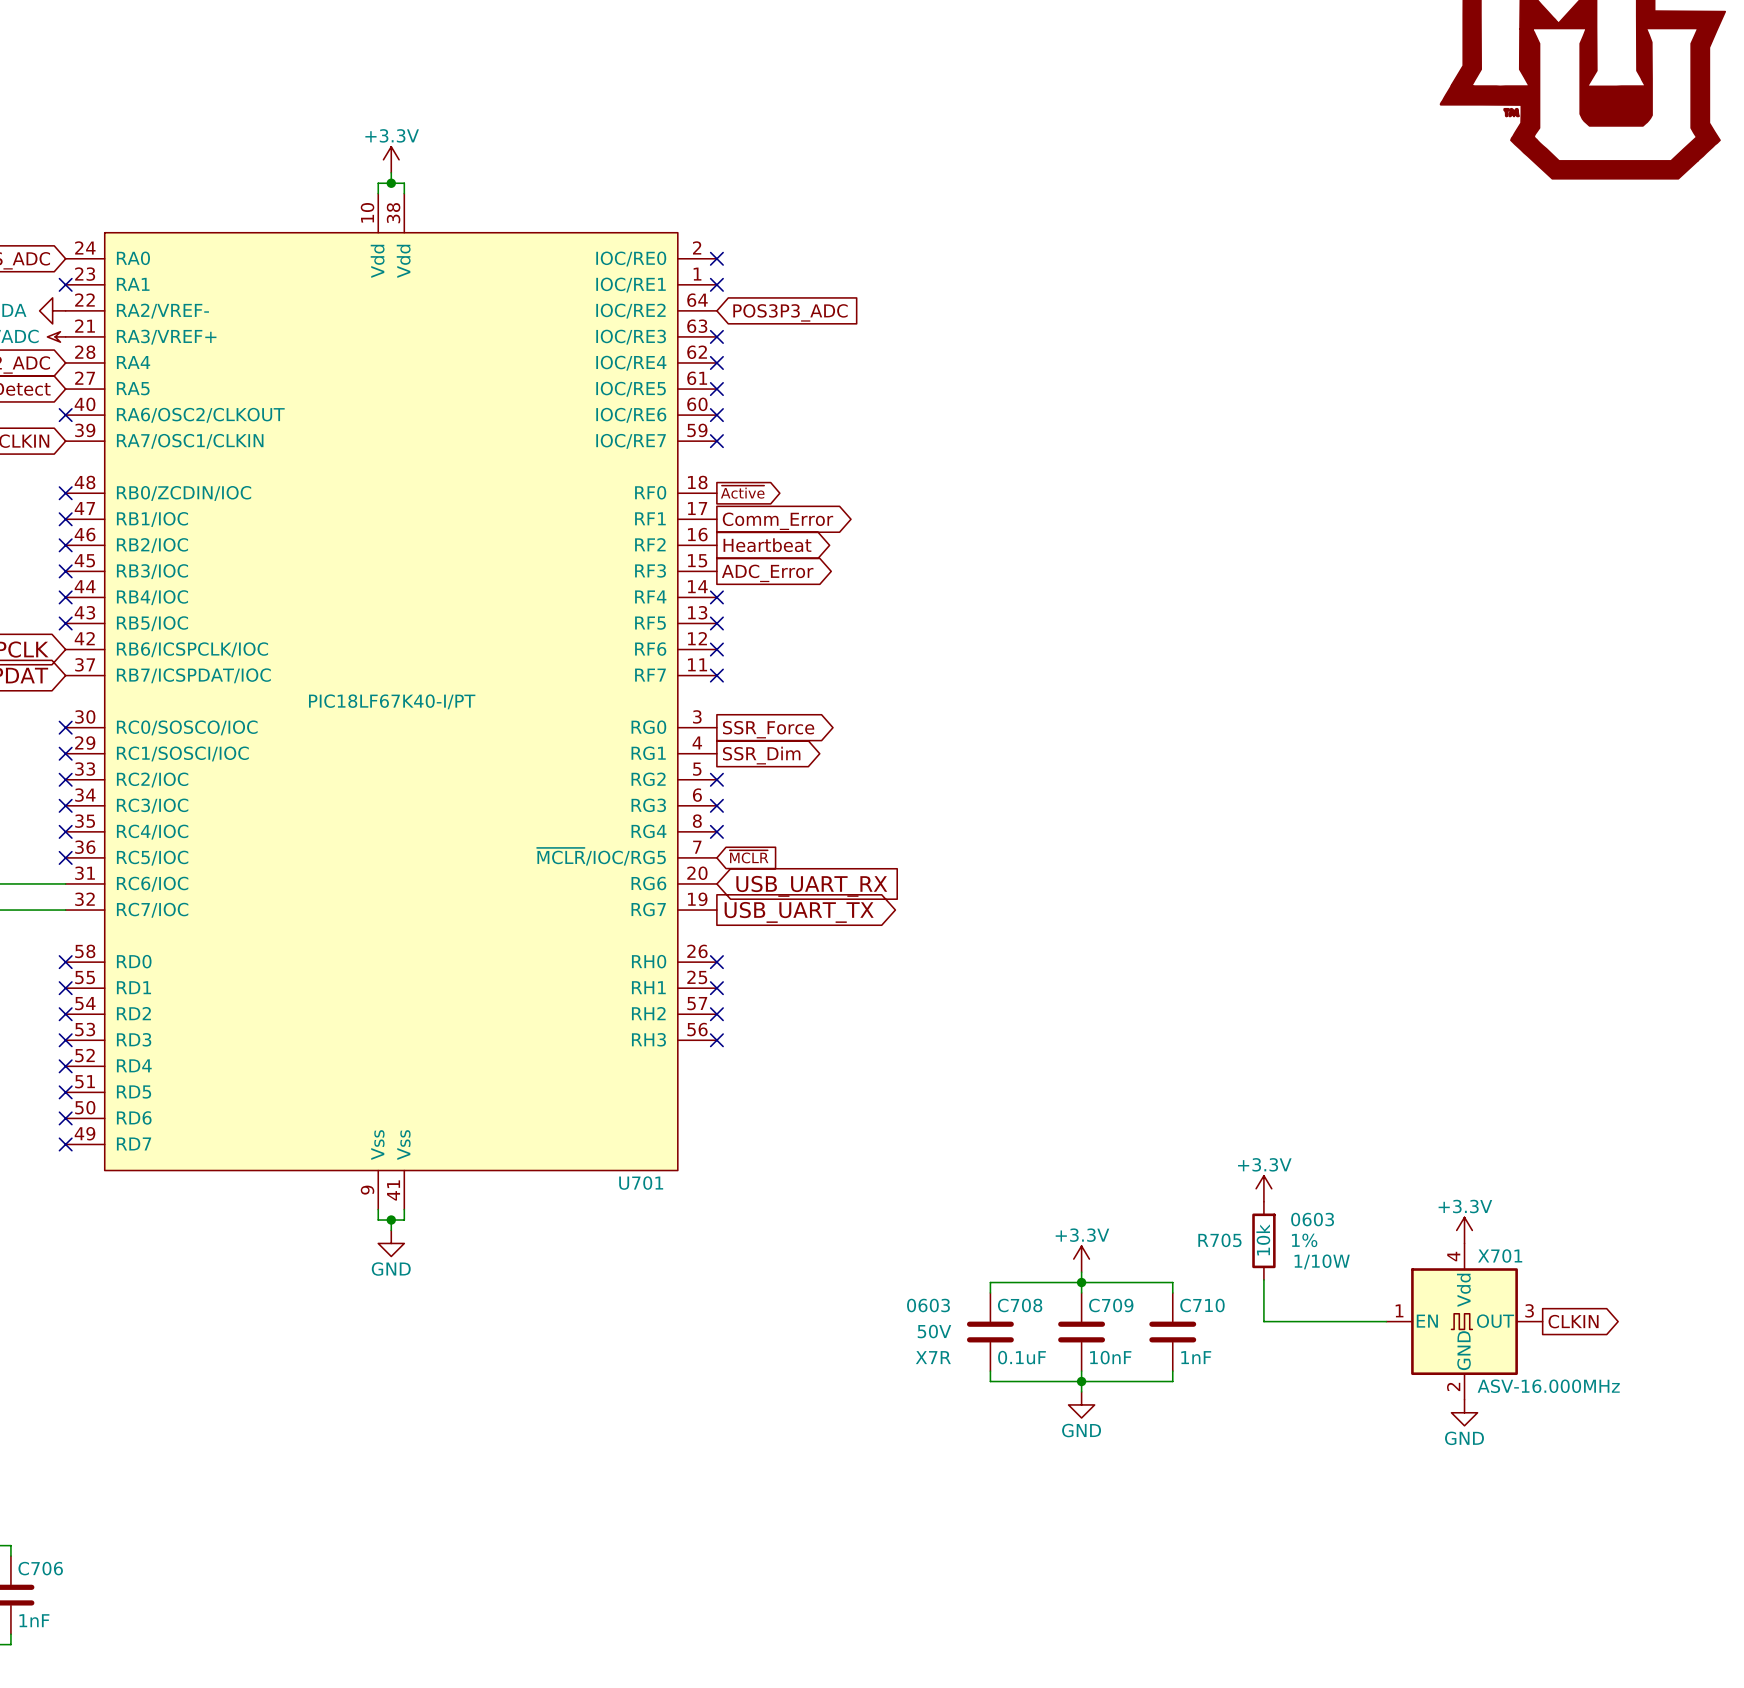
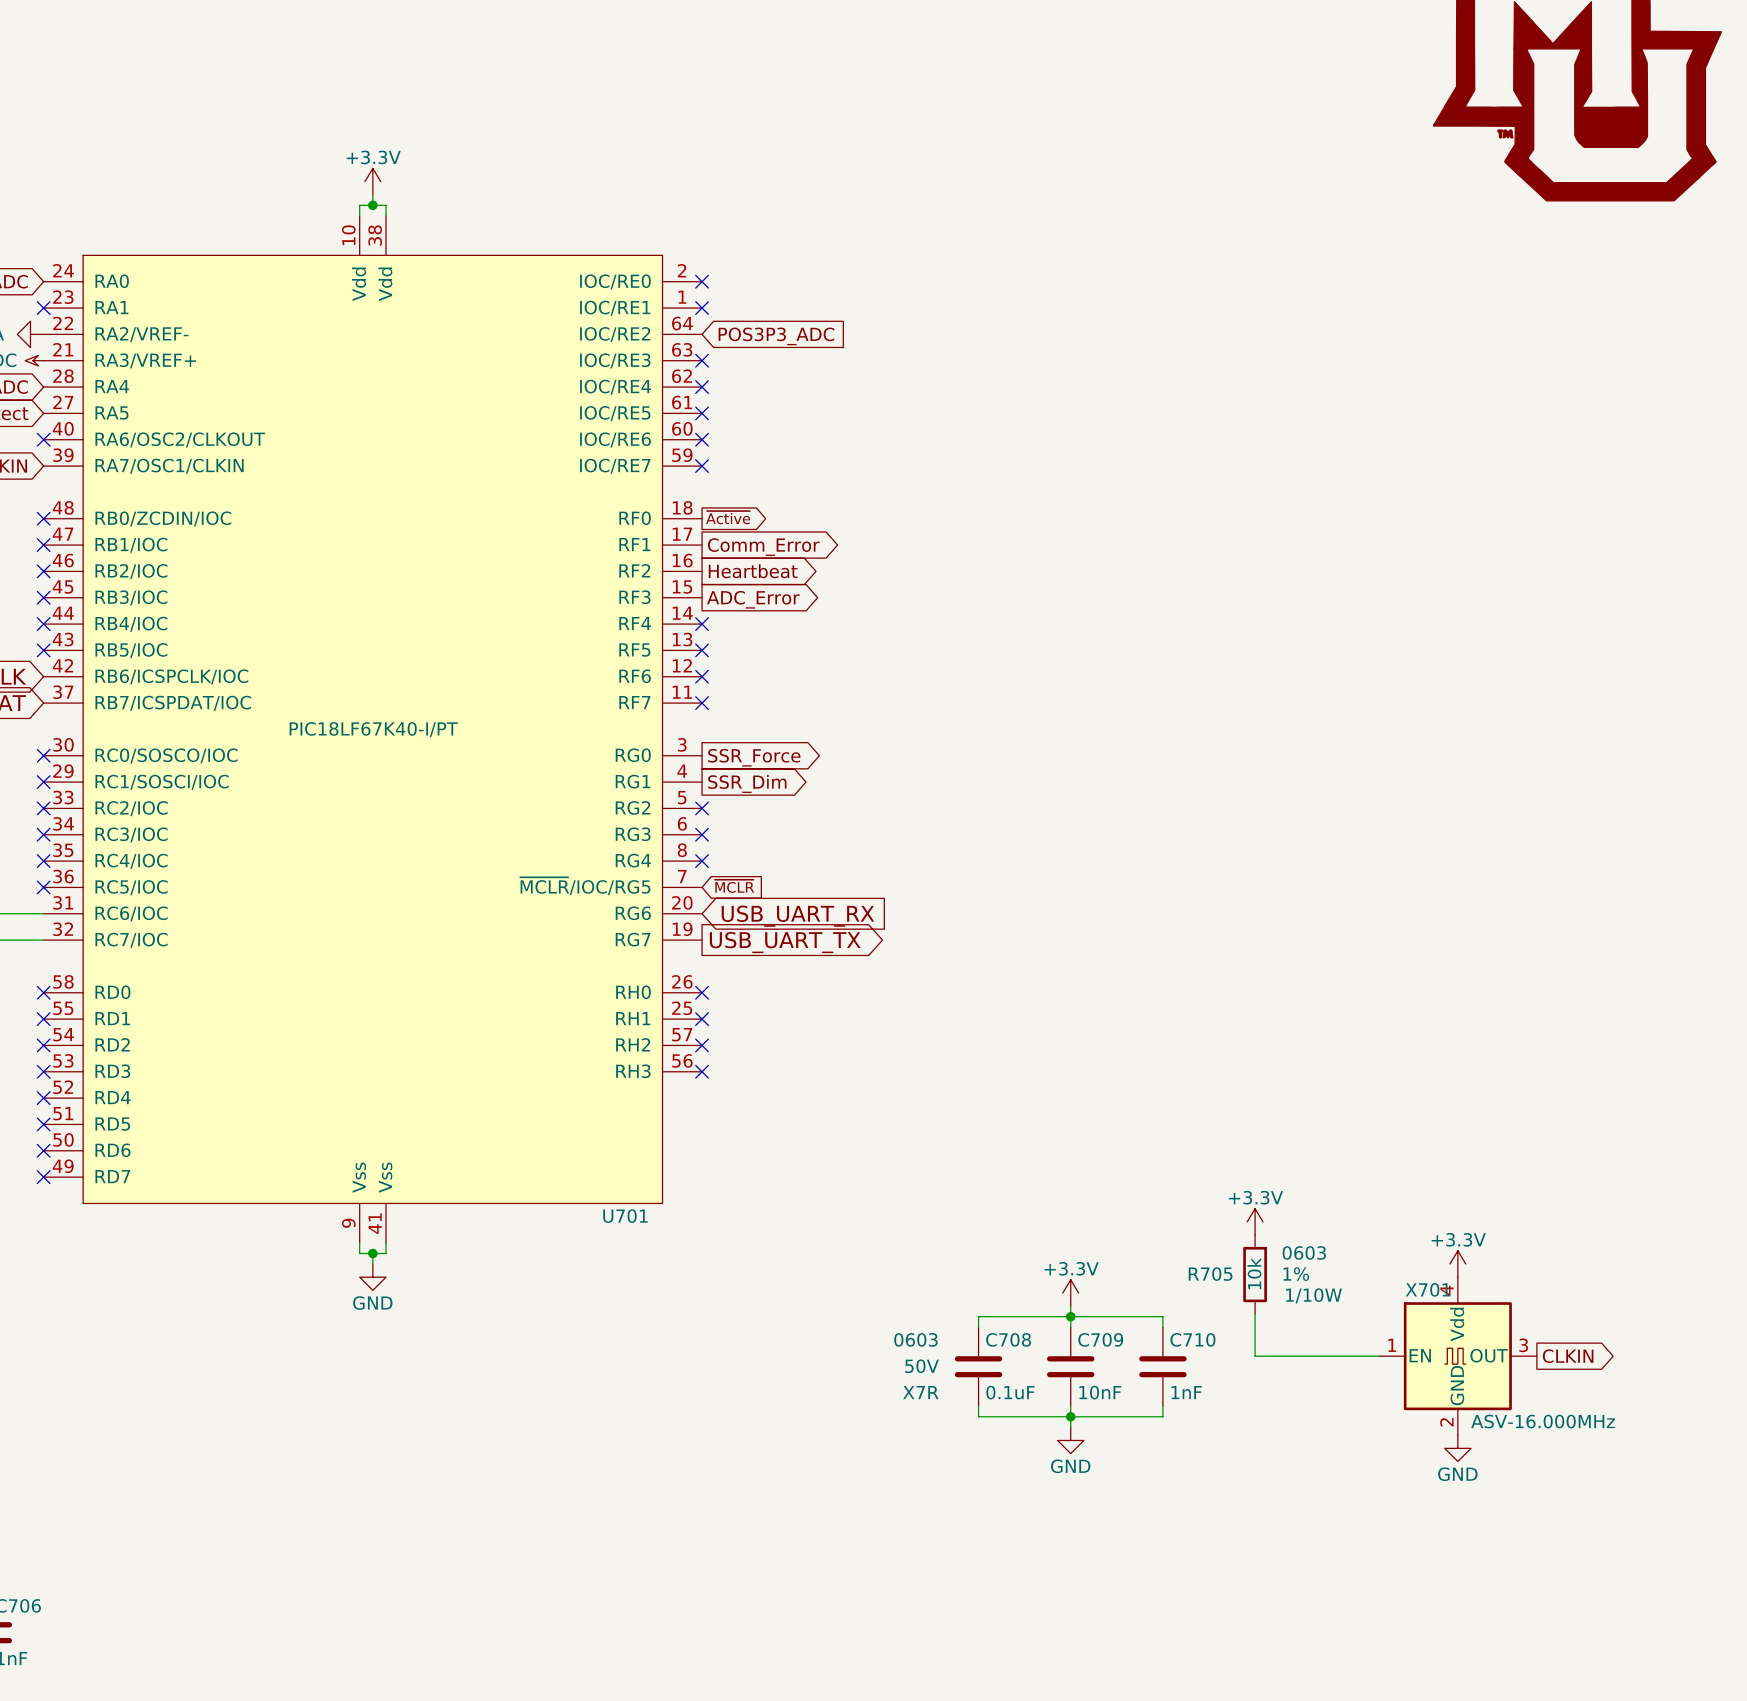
X701 name position: X701 (1500, 1256) -> X701 (1428, 1289)

